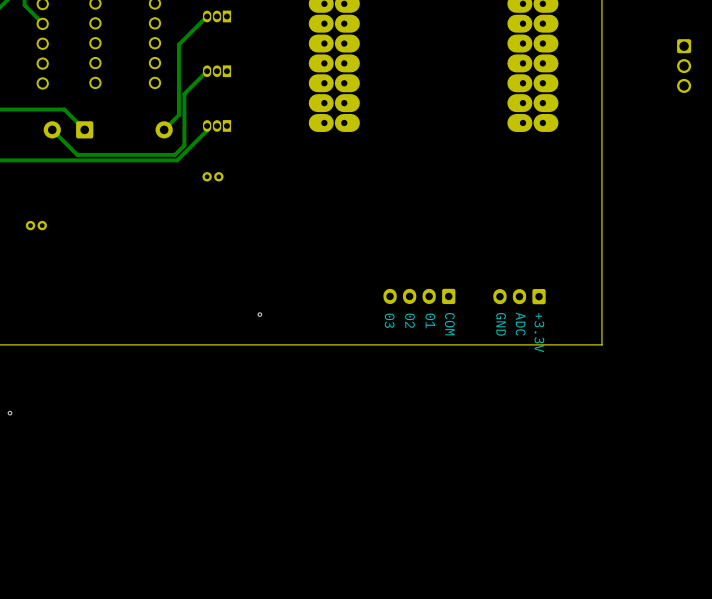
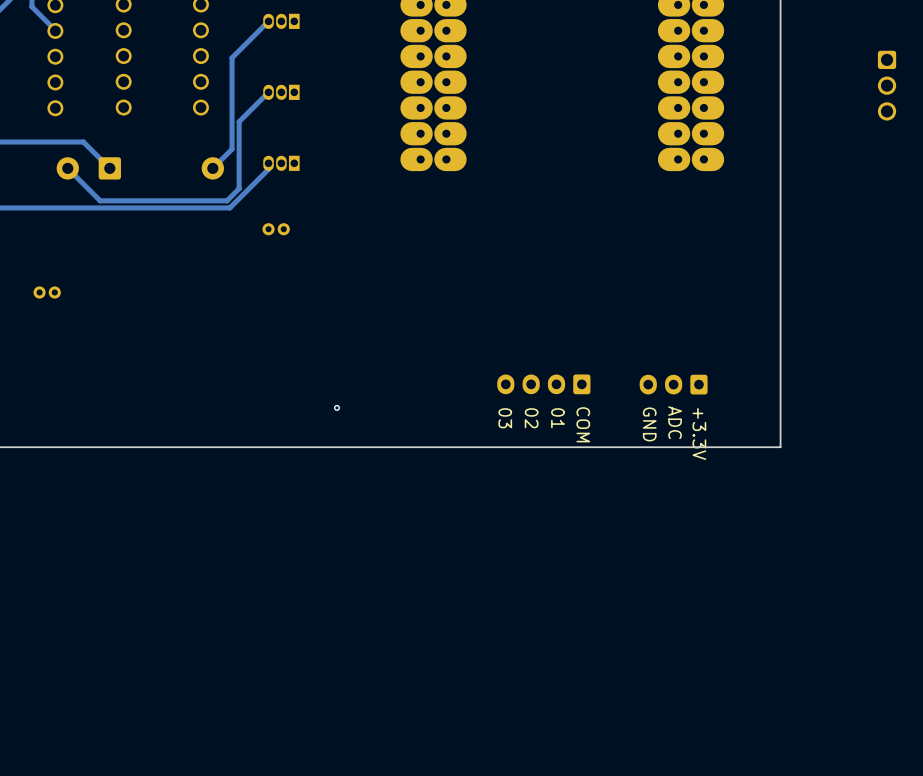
via: (10, 413) -> none

